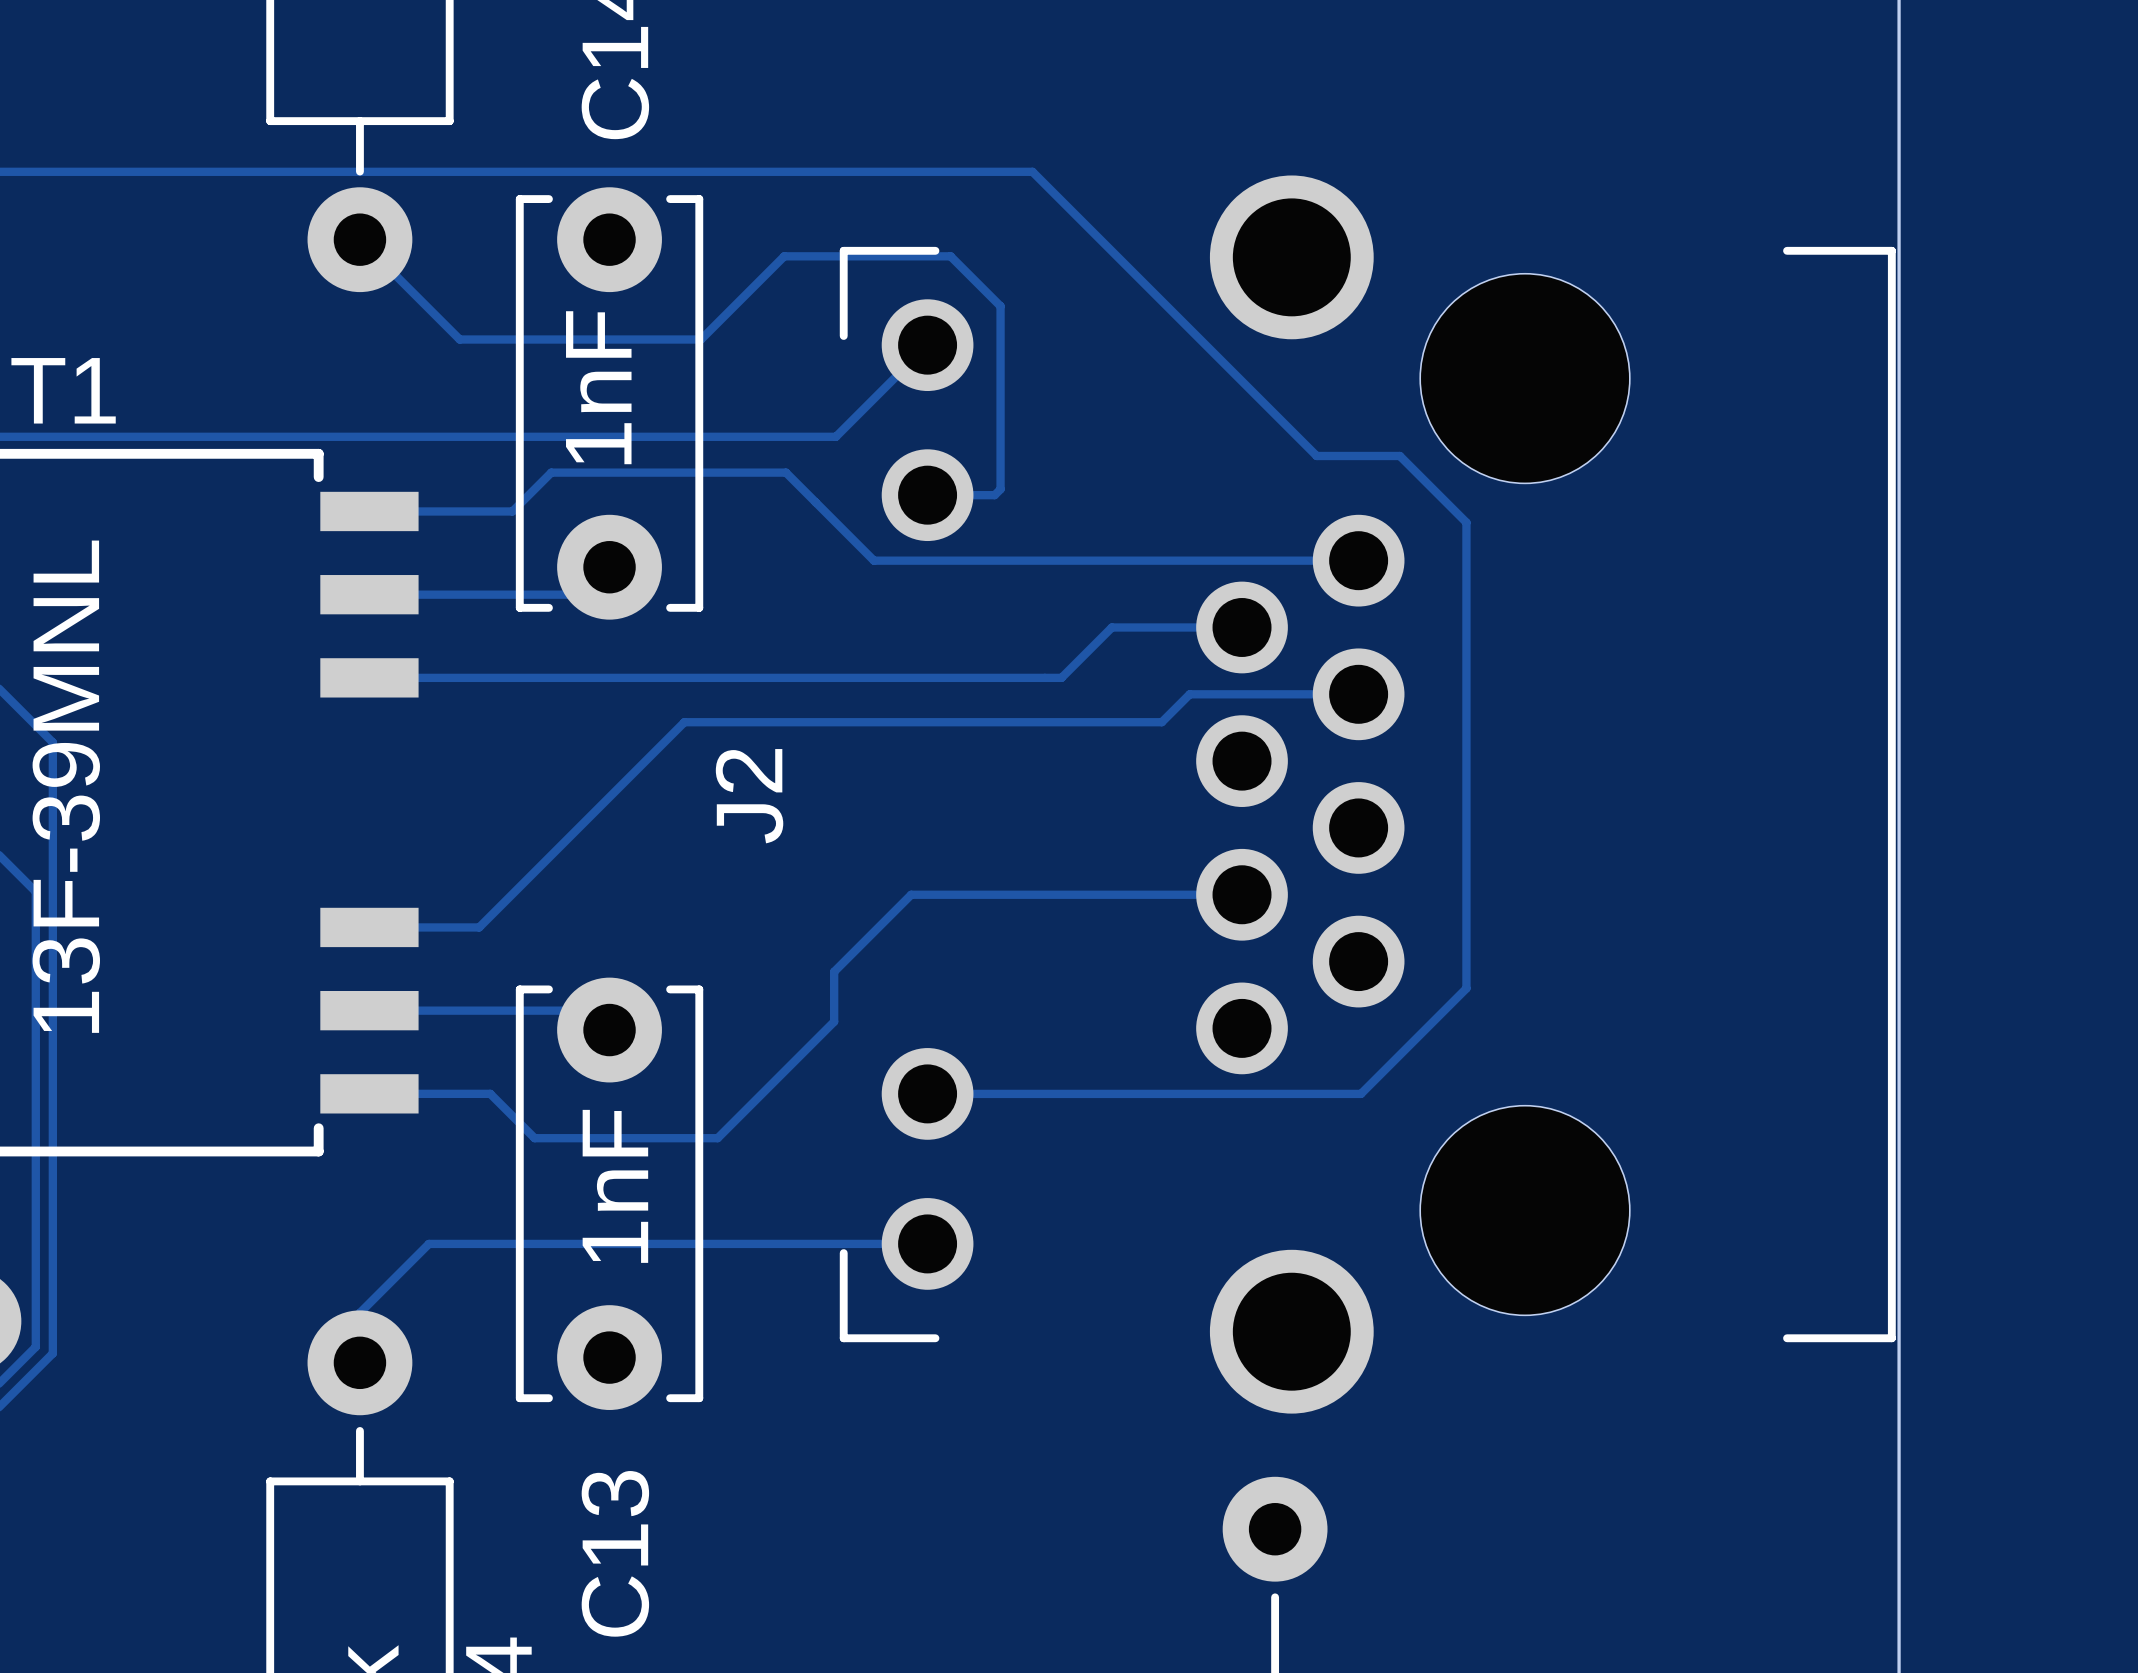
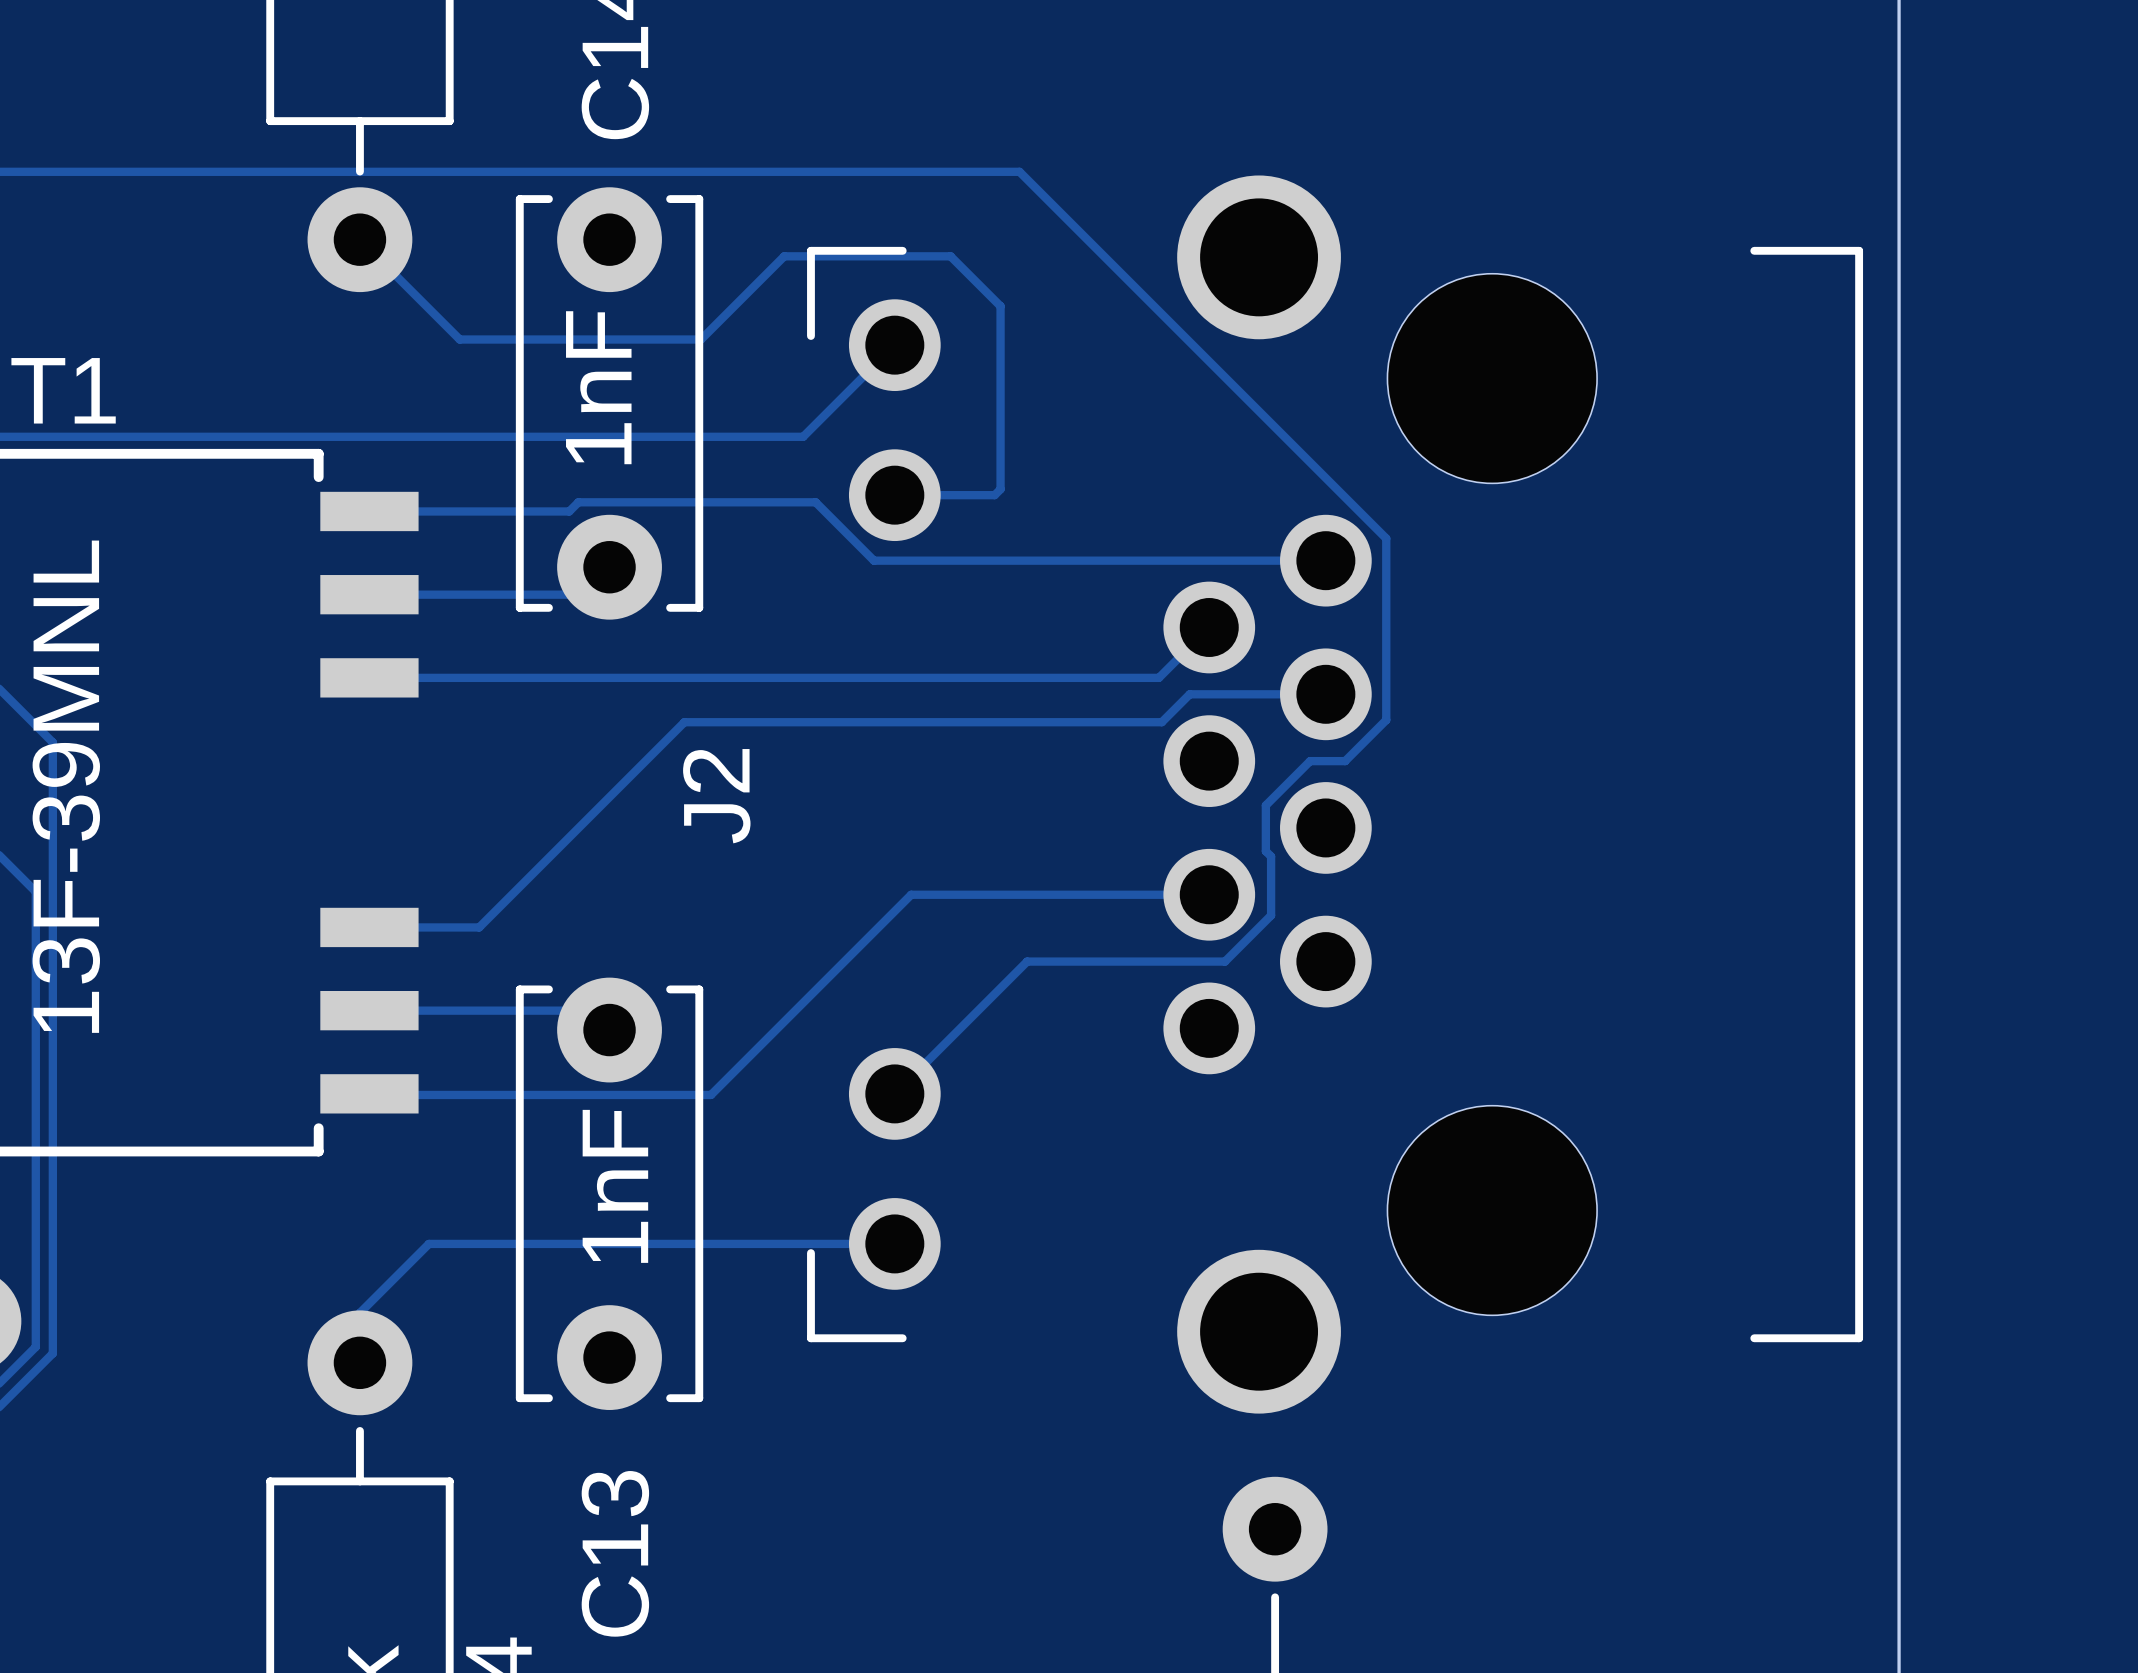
track: (1019, 171) (1032, 171) (1316, 455) (1399, 455) (1466, 522) (1466, 988) (1360, 1093) (927, 1093) -> (1019, 171) (1386, 538) (1386, 720) (1345, 761) (1310, 761) (1265, 805) (1265, 851) (1271, 856) (1271, 915) (1224, 961) (1027, 961) (894, 1093)
track: (927, 345) (835, 436) (803, 436) -> (894, 345) (803, 436)
track: (815, 502) (786, 472) (551, 472) (512, 511) -> (815, 502) (578, 502) (569, 511) (512, 511)
track: (1242, 627) (1111, 627) (1061, 677) -> (1209, 627) (1158, 677) (1061, 677)
J2 position: (1367, 794) -> (1335, 794)
track: (834, 971) (834, 1021) (717, 1138) (534, 1138) (490, 1093) (369, 1093) -> (834, 971) (711, 1094) (370, 1094)

